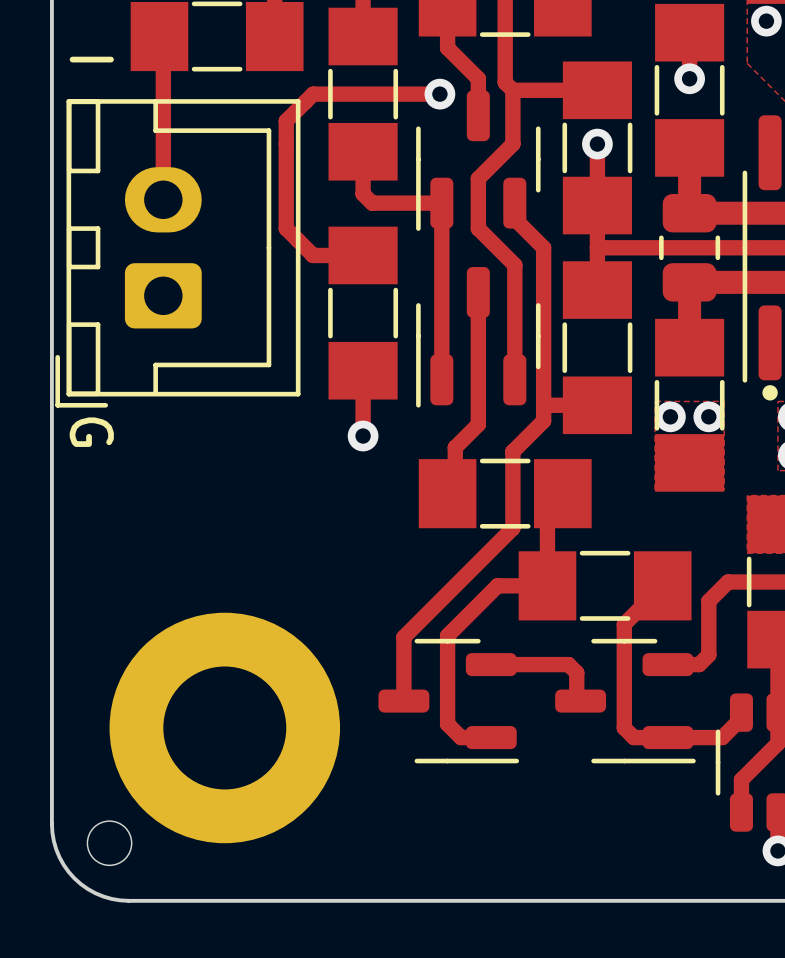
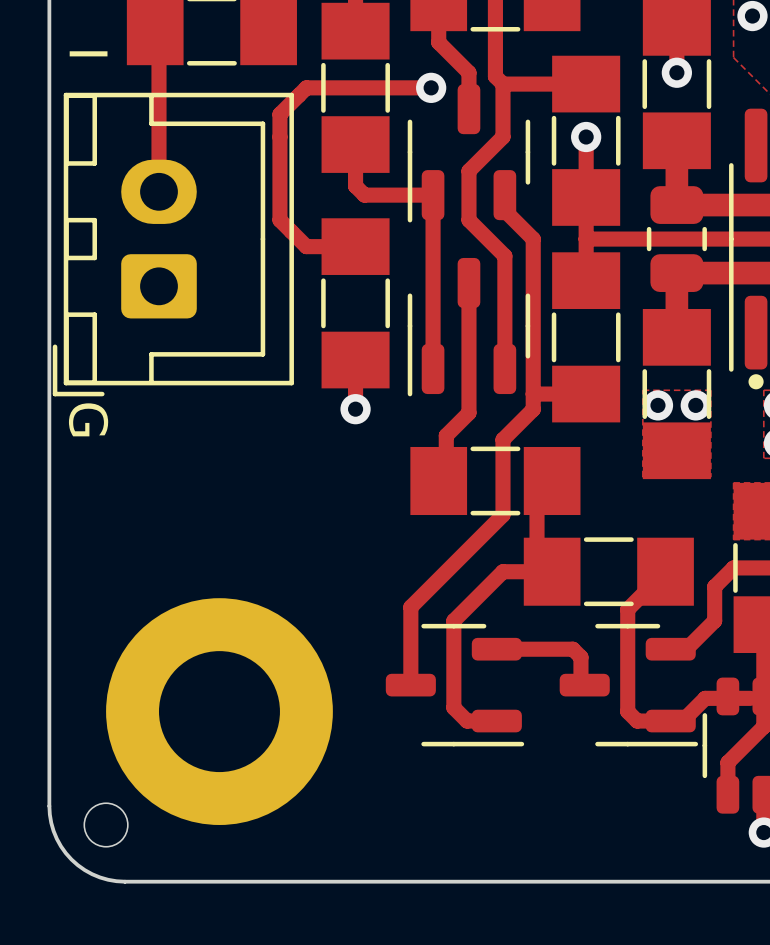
via position: (363, 436) -> (355, 409)
track: (747, 582) (728, 582) (708, 601) (708, 654) -> (733, 567) (714, 586) (714, 620) (695, 639)
track: (512, 585) (497, 585) (447, 635) (447, 724) (461, 737) (476, 737) -> (502, 571) (453, 620) (453, 707) (467, 721)
part position: (605, 585) -> (608, 571)
track: (662, 585) (624, 624) (624, 727) (633, 737) (649, 737) -> (665, 571) (627, 609) (627, 711) (637, 721)
track: (419, 621) (403, 637) (403, 701) -> (410, 607) (410, 685)
track: (568, 664) (576, 672) (576, 701) -> (557, 649) (572, 649) (580, 657) (580, 685)
part position: (448, 701) -> (454, 685)
part position: (625, 701) -> (628, 685)
track: none -> (750, 698) (705, 698) (682, 721)
track: (741, 718) (722, 737) (683, 737) -> none

